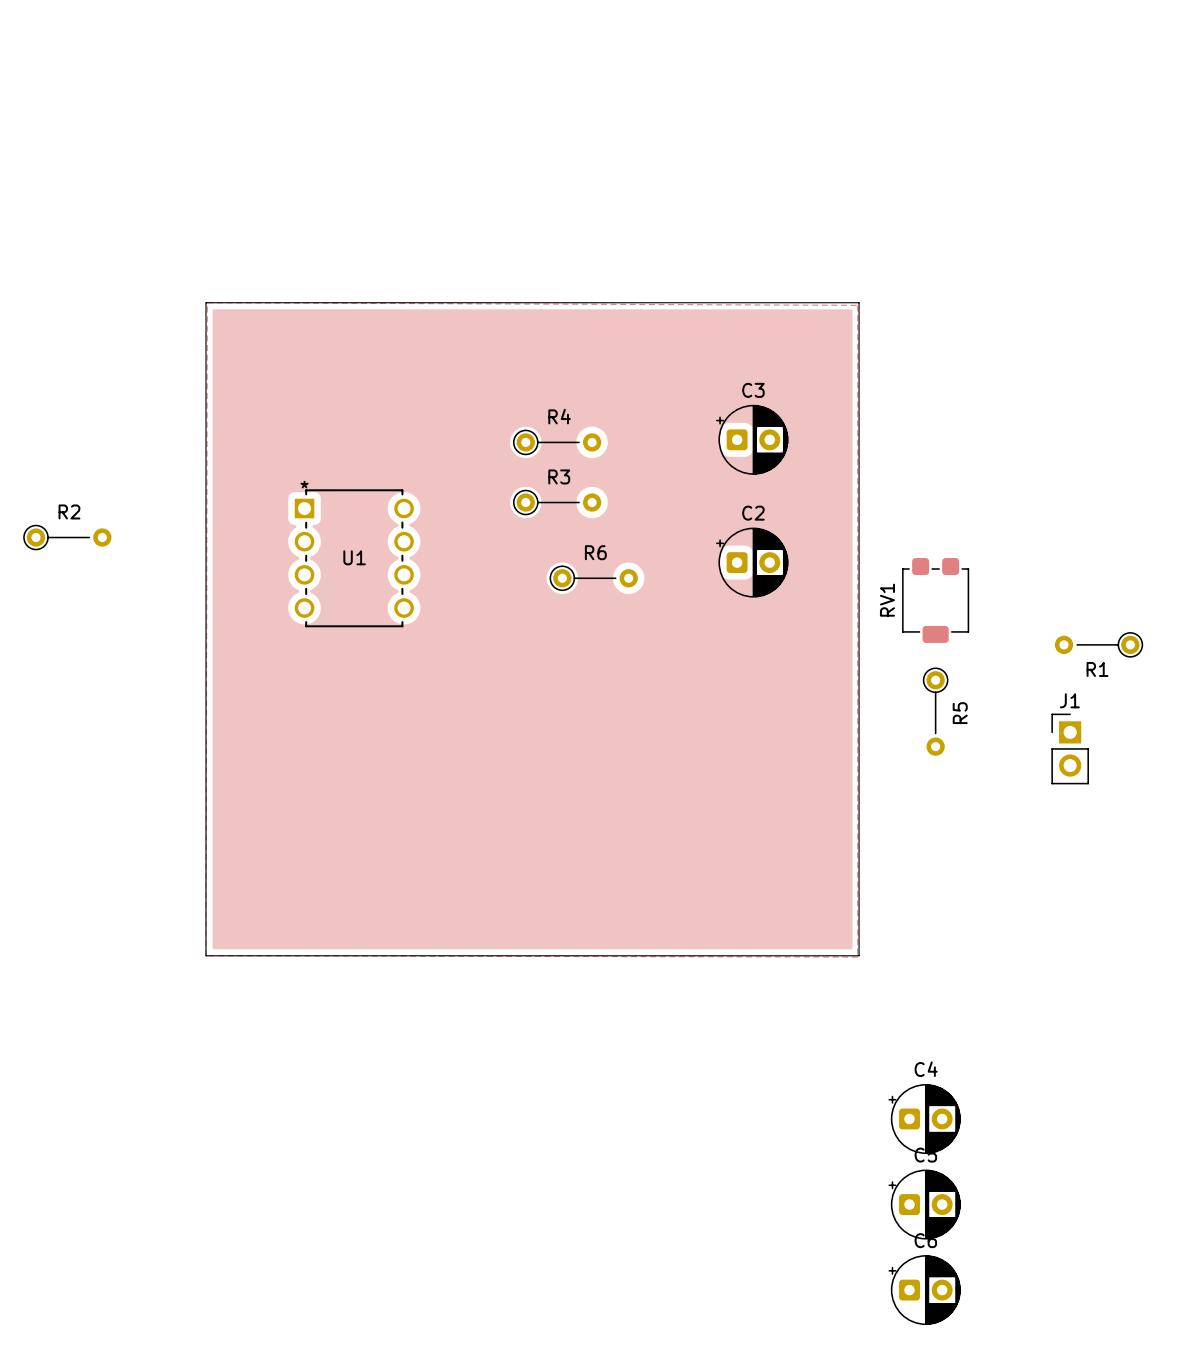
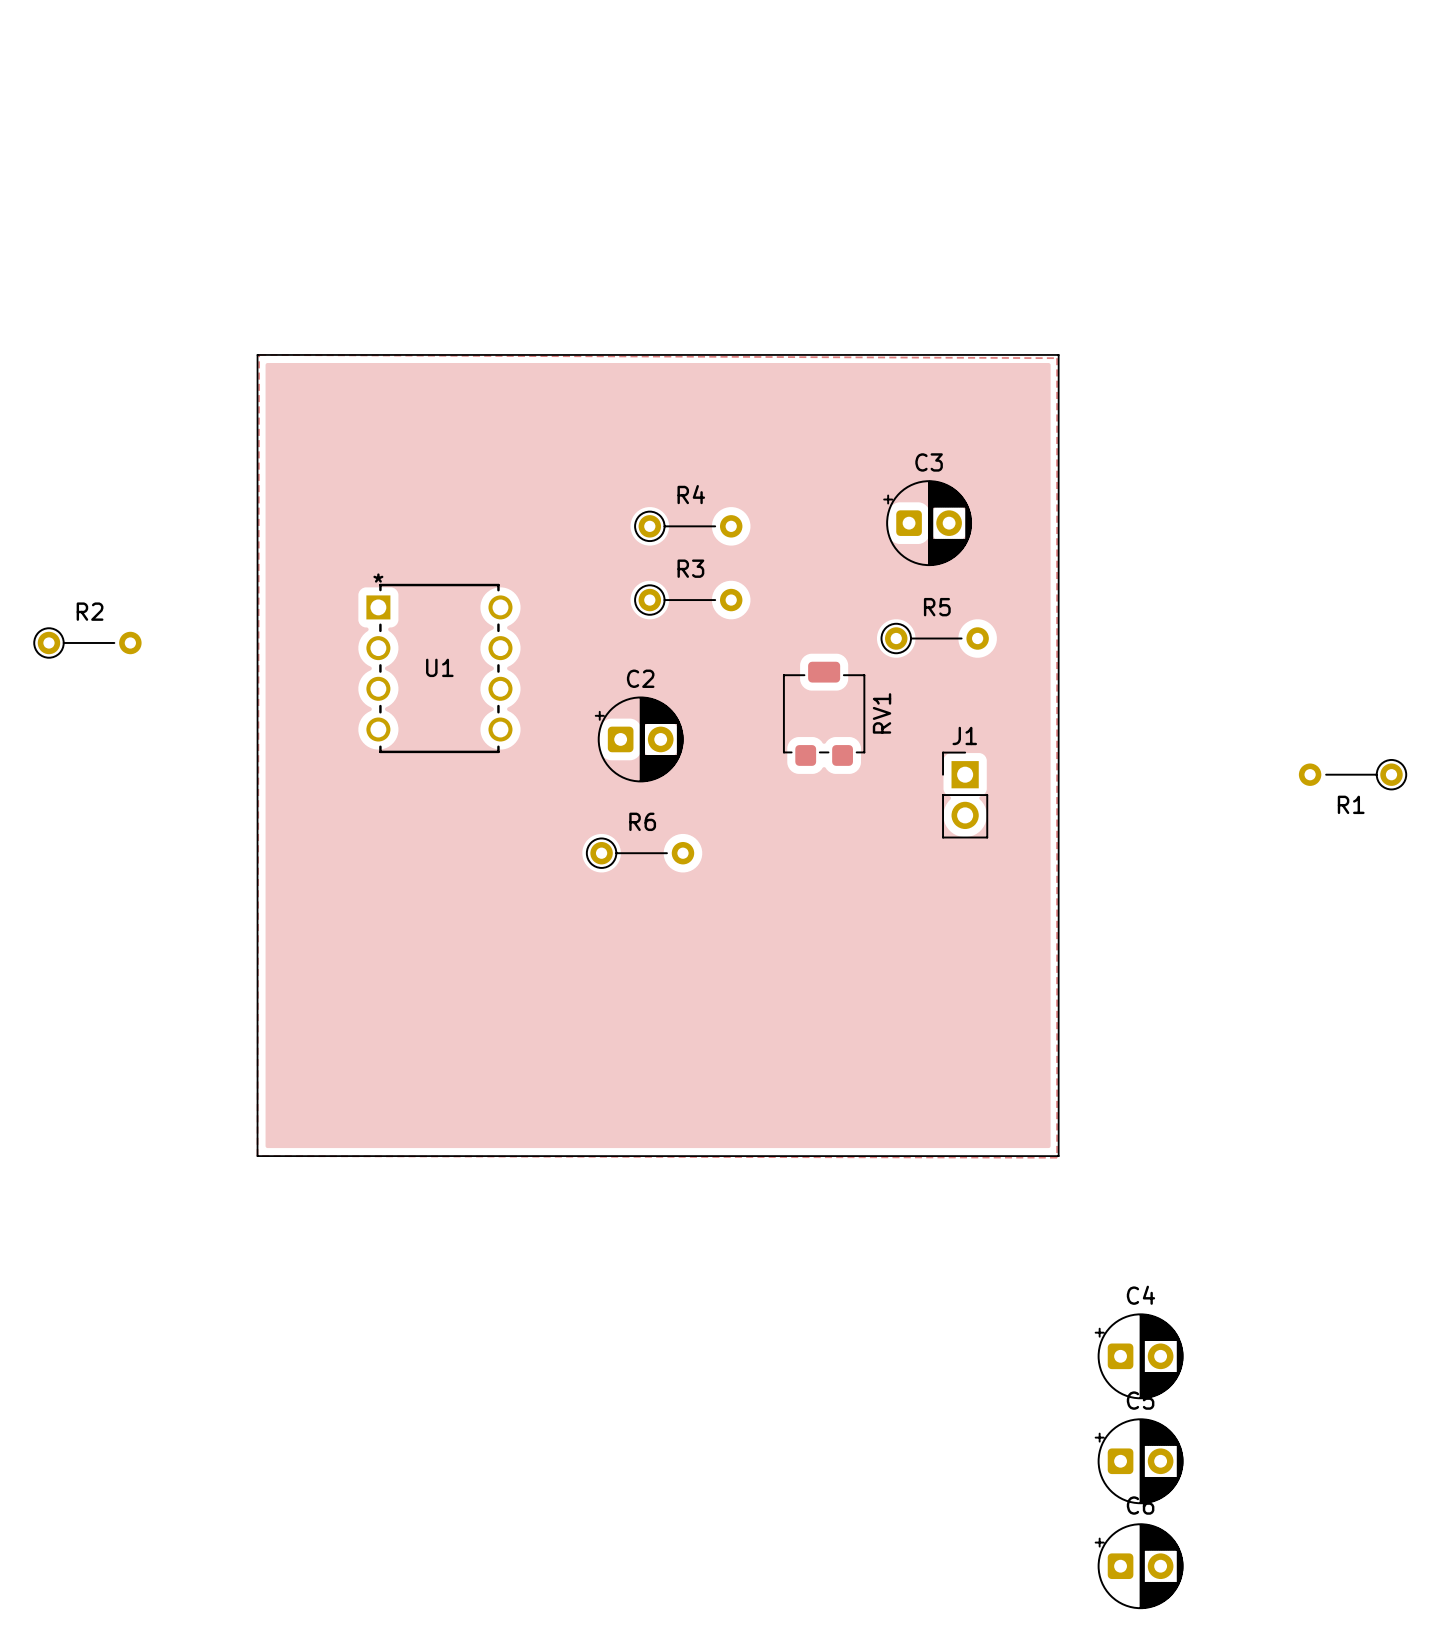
C2 position: (752, 562) -> (639, 739)
R6 position: (593, 578) -> (640, 853)
RV1 rotation: 0° (935, 600) -> 180° (824, 713)
RV1 position: (935, 600) -> (824, 713)
R5 rotation: 0° (935, 711) -> 90° counterclockwise (934, 638)
R5 position: (935, 711) -> (934, 638)
J1 position: (1070, 748) -> (965, 795)

